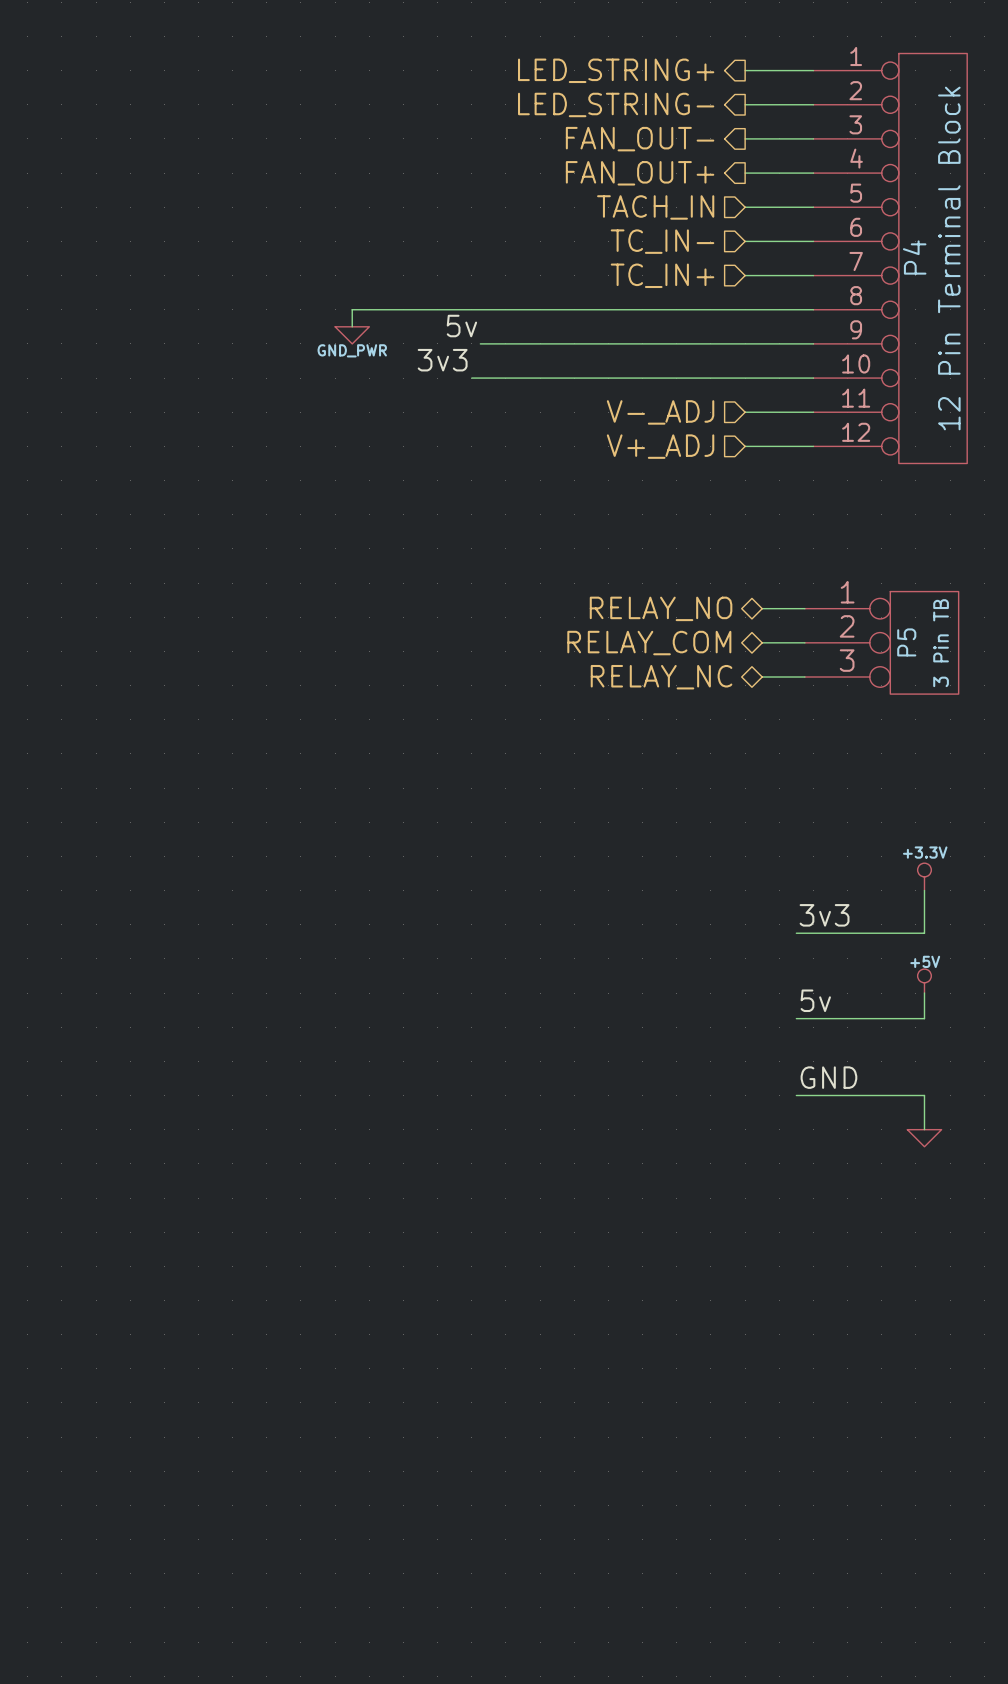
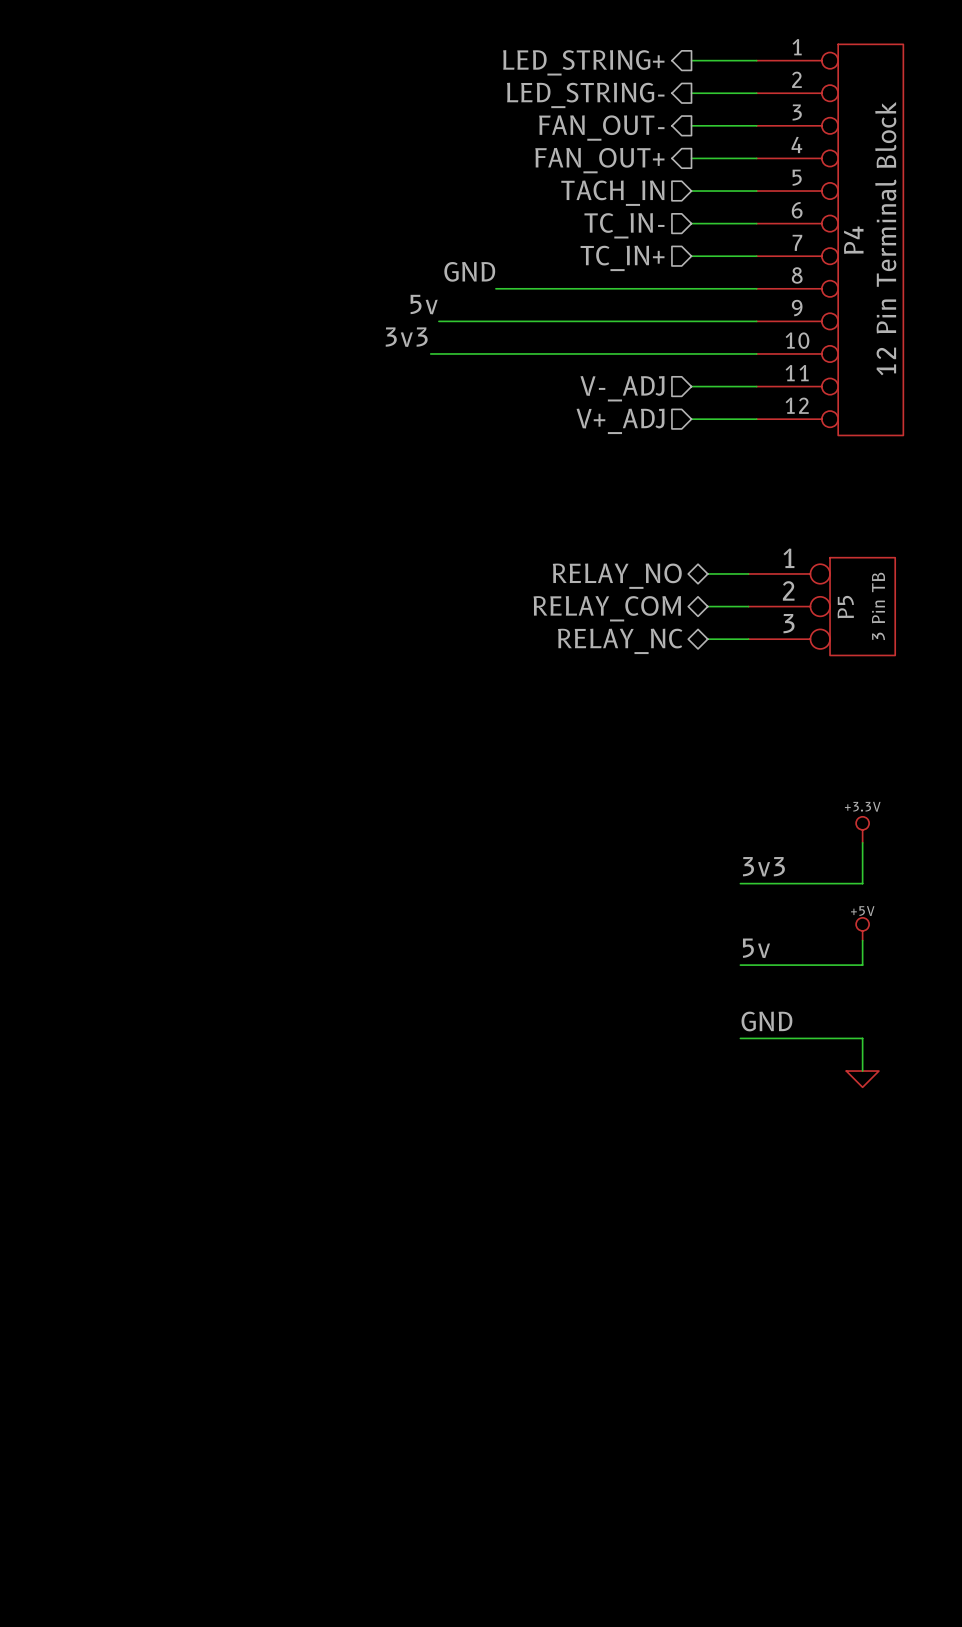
label: none -> GND (469, 271)
wire: (540, 309) (352, 309) (352, 326) -> none
power symbol: GND_PWR (352, 335) -> none

